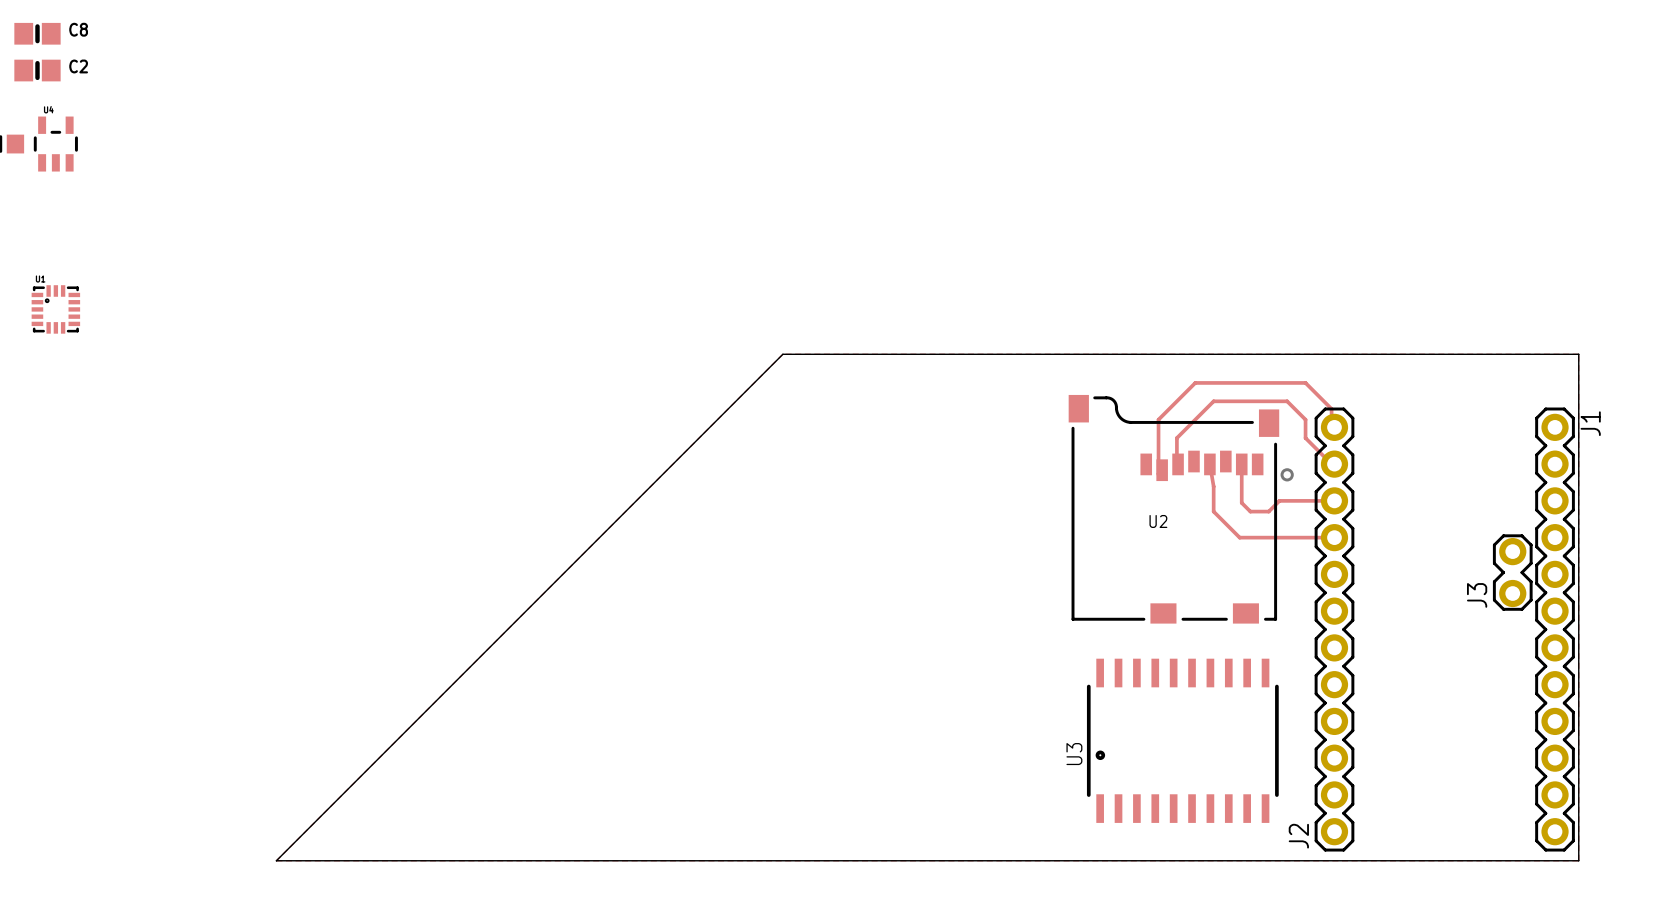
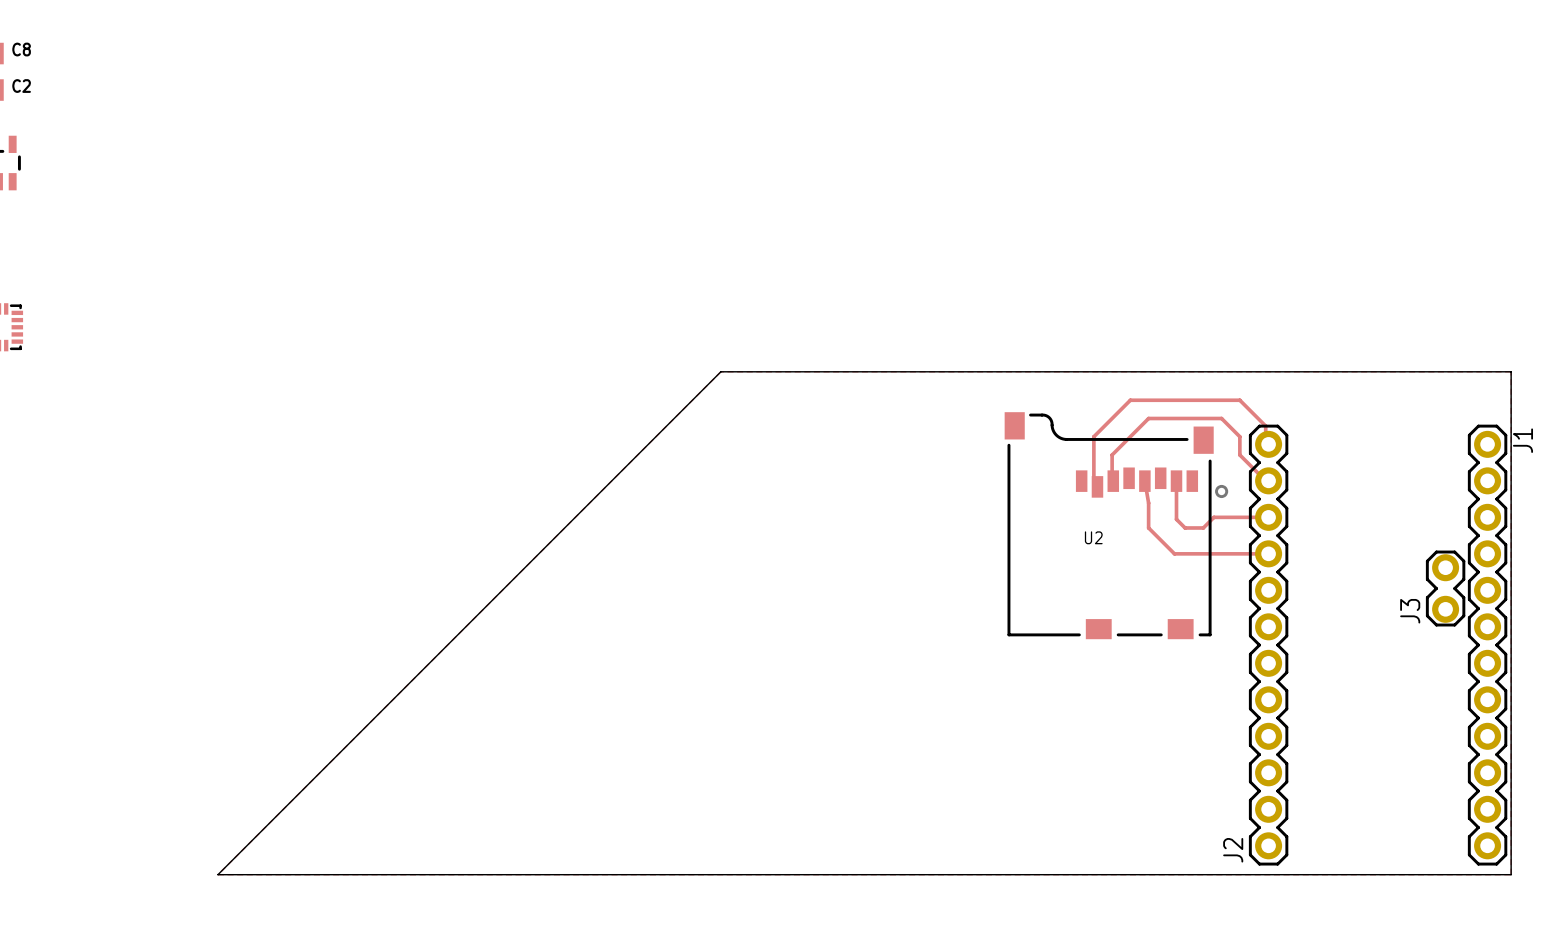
U3: (1182, 740) -> none

